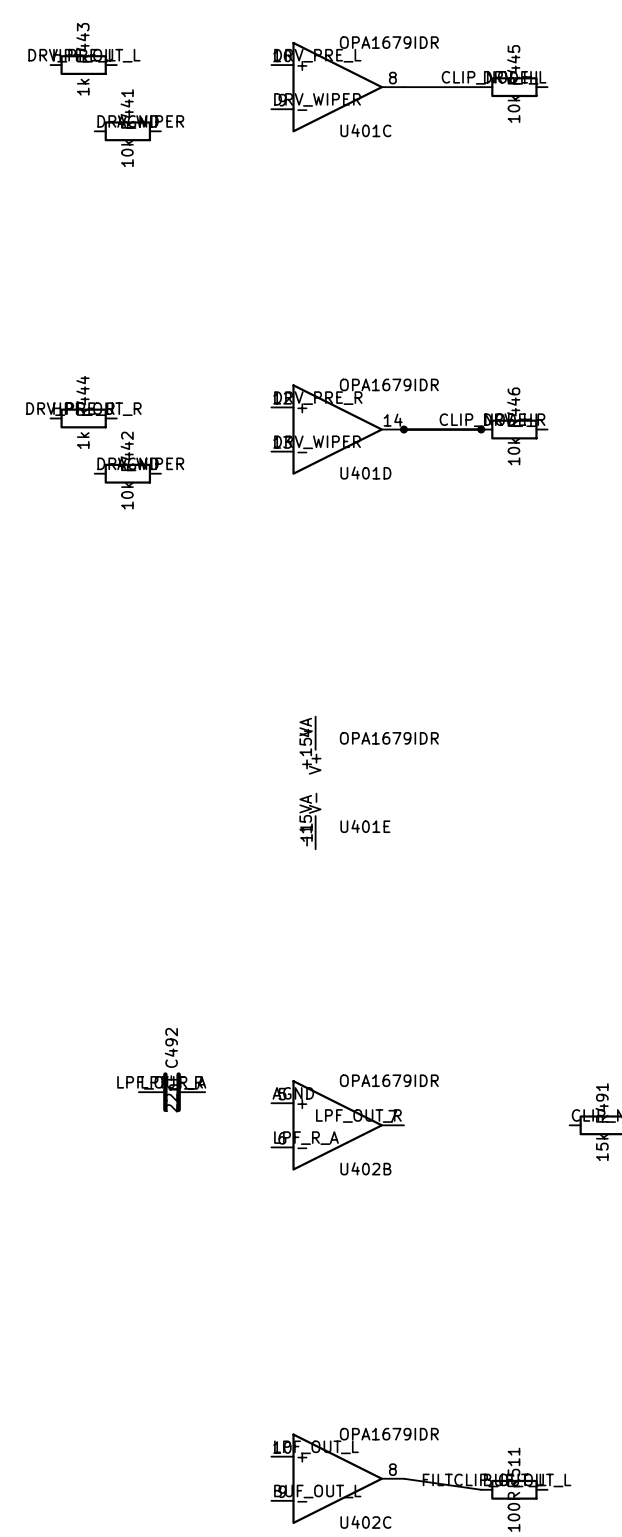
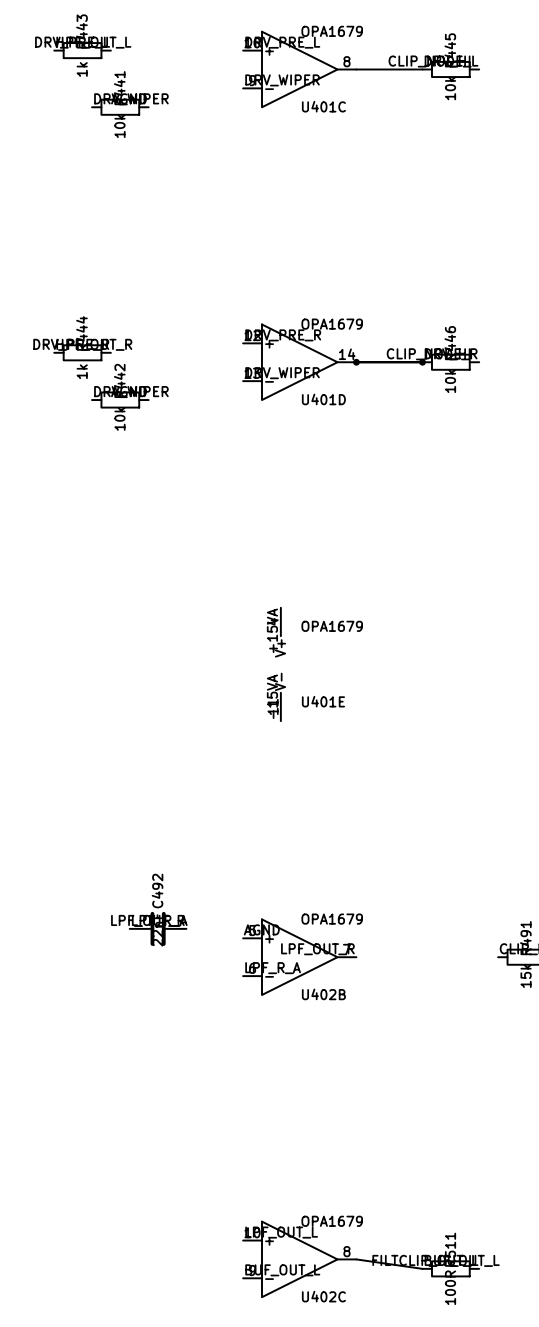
U401C value: OPA1679IDR (389, 42) -> OPA1679 (332, 31)
U401D value: OPA1679IDR (389, 384) -> OPA1679 (332, 324)
U401E value: OPA1679IDR (389, 738) -> OPA1679 (332, 626)
U402B value: OPA1679IDR (389, 1080) -> OPA1679 (332, 919)
U402C value: OPA1679IDR (389, 1434) -> OPA1679 (332, 1221)

